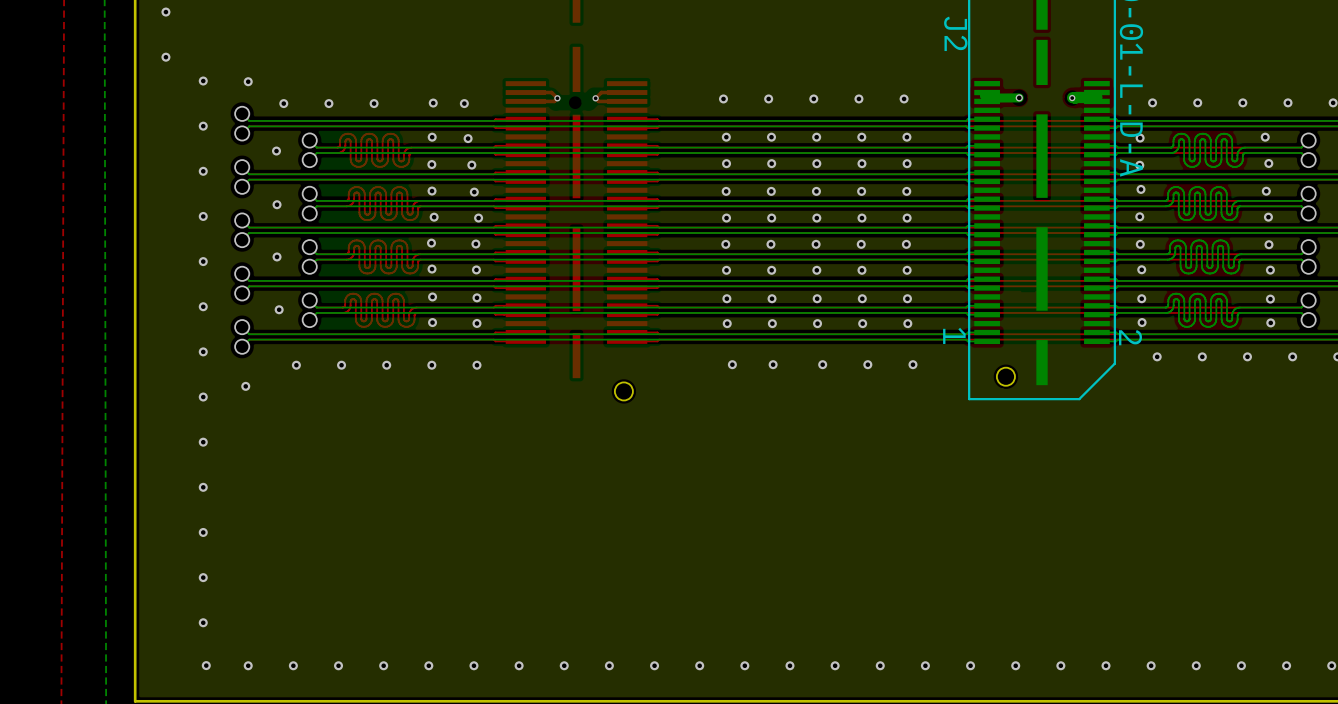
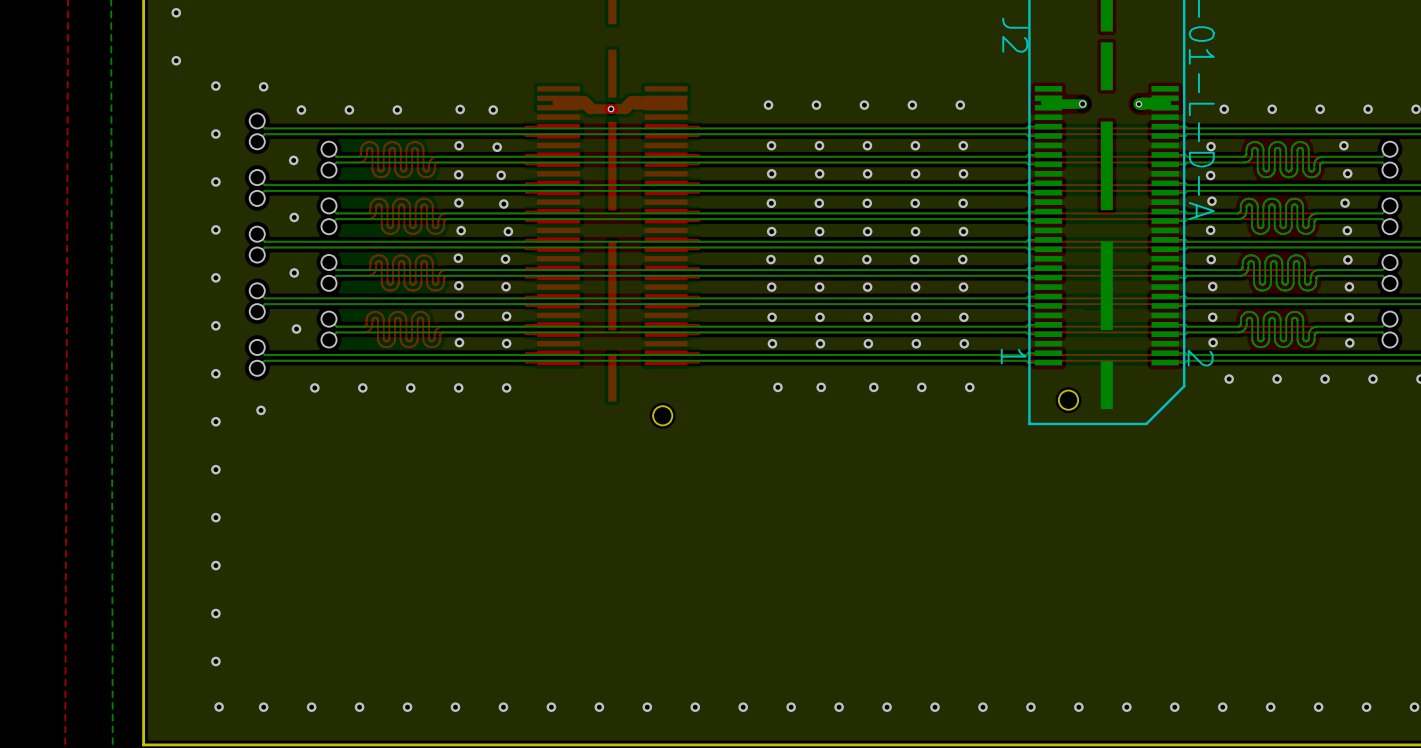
top track: none -> (558, 102) (584, 102) (591, 109) (624, 109) (631, 102) (681, 103)
via: (557, 98) -> none
via: (595, 98) -> none
via: none -> (611, 109)

